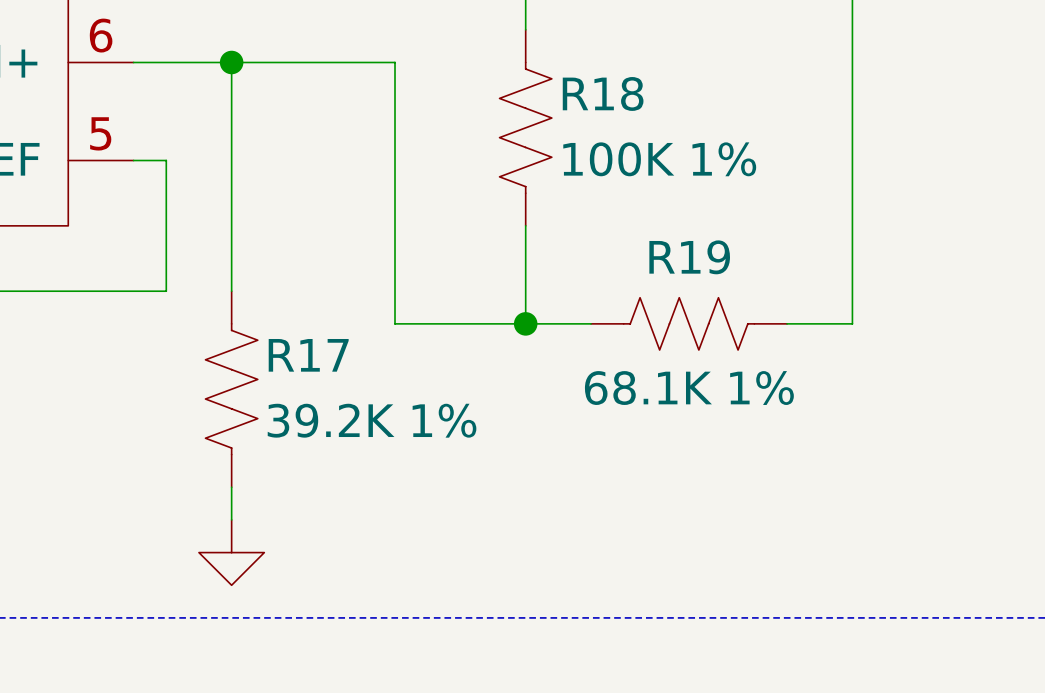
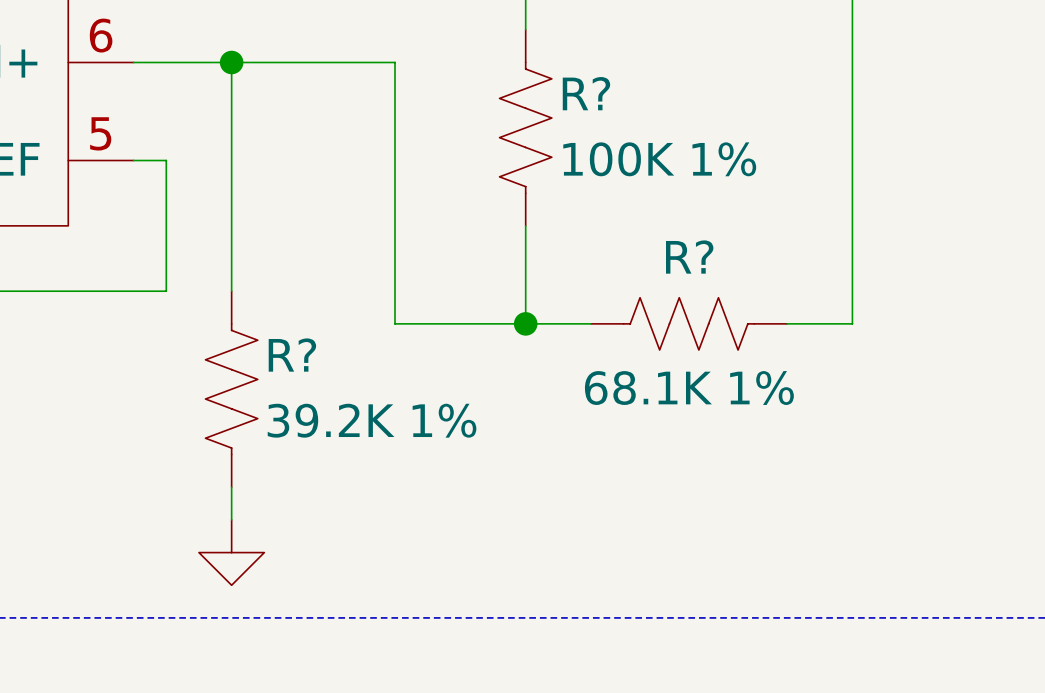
R18 name: R18 (603, 93) -> R? (586, 93)
R19 name: R19 (689, 257) -> R? (689, 257)
R17 name: R17 (308, 355) -> R? (292, 355)

